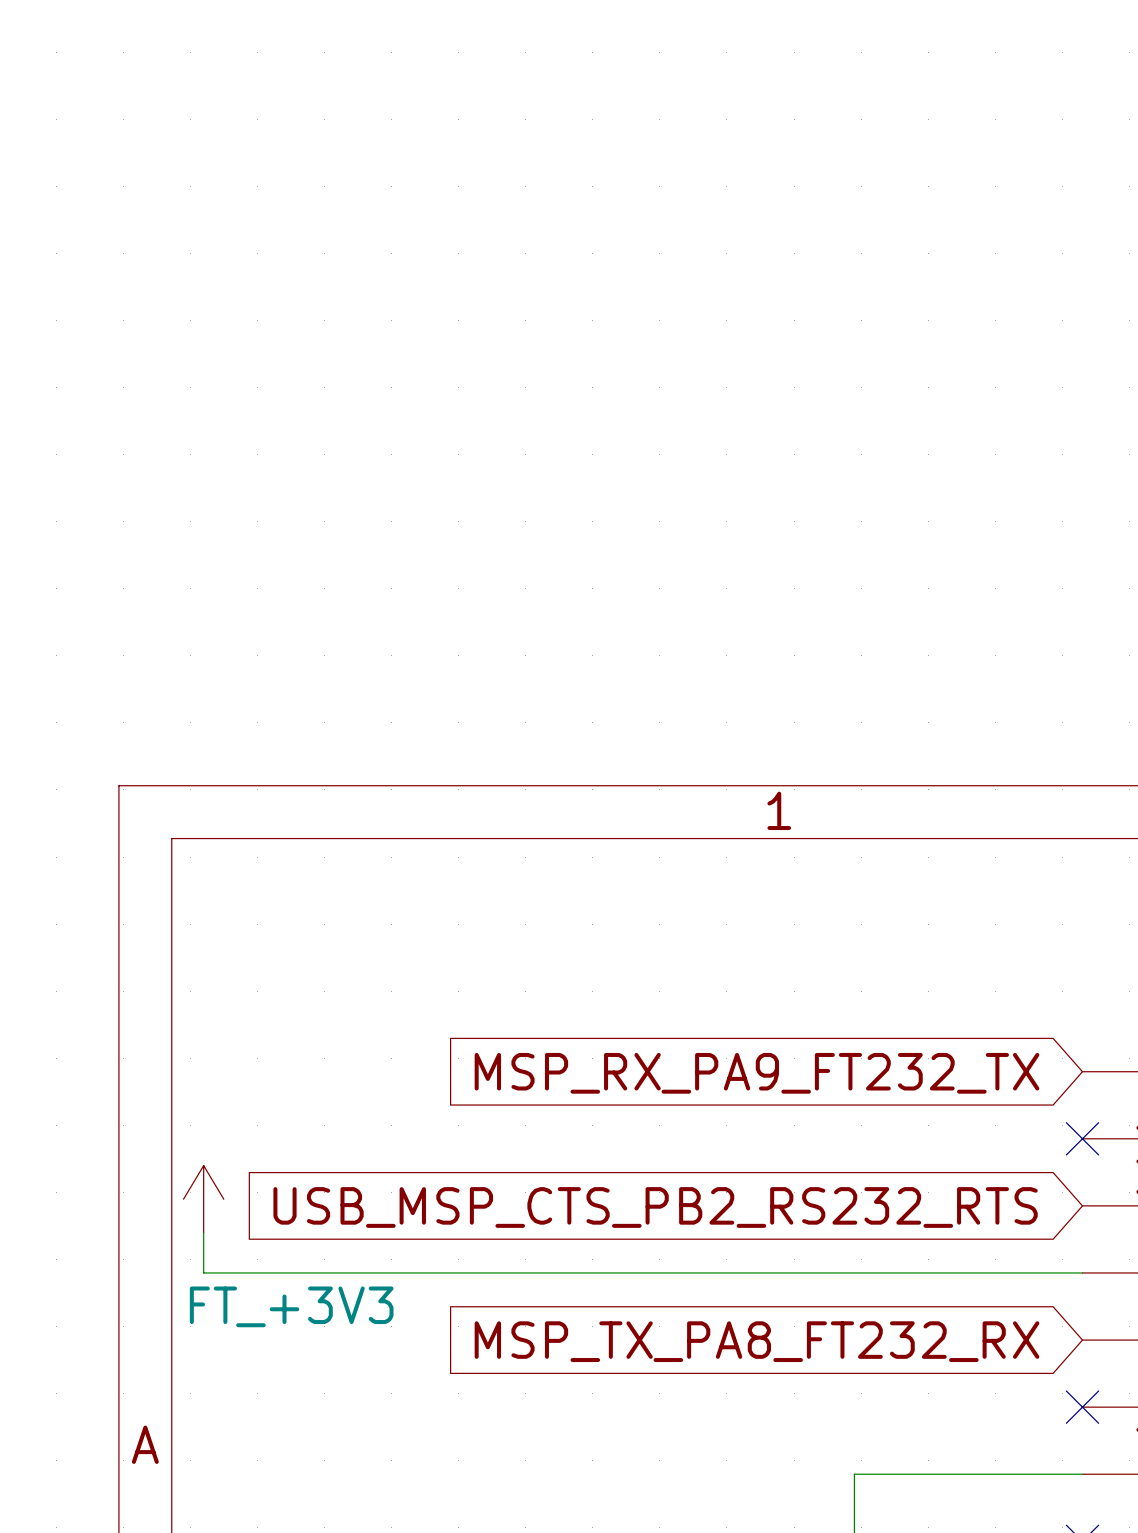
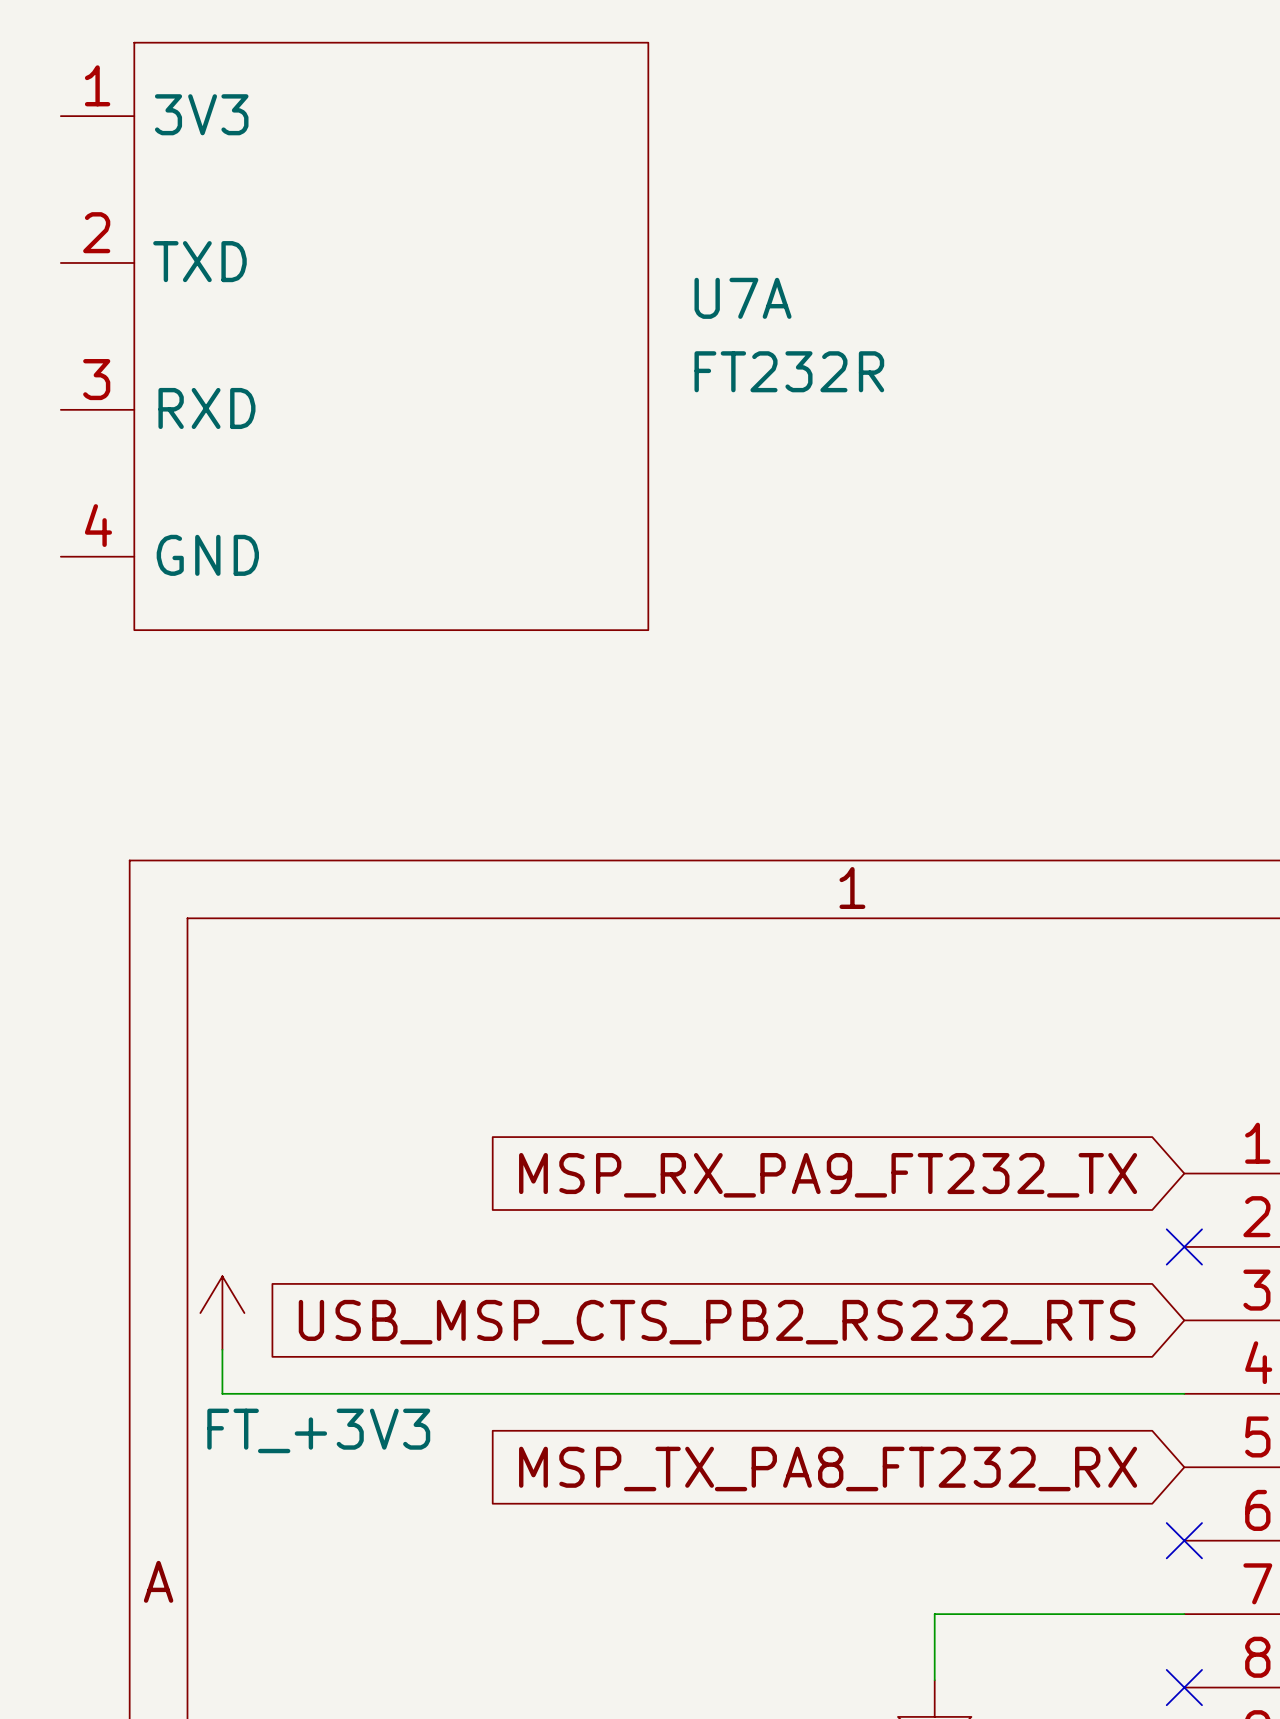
U7A: none -> FT232R (354, 336)

